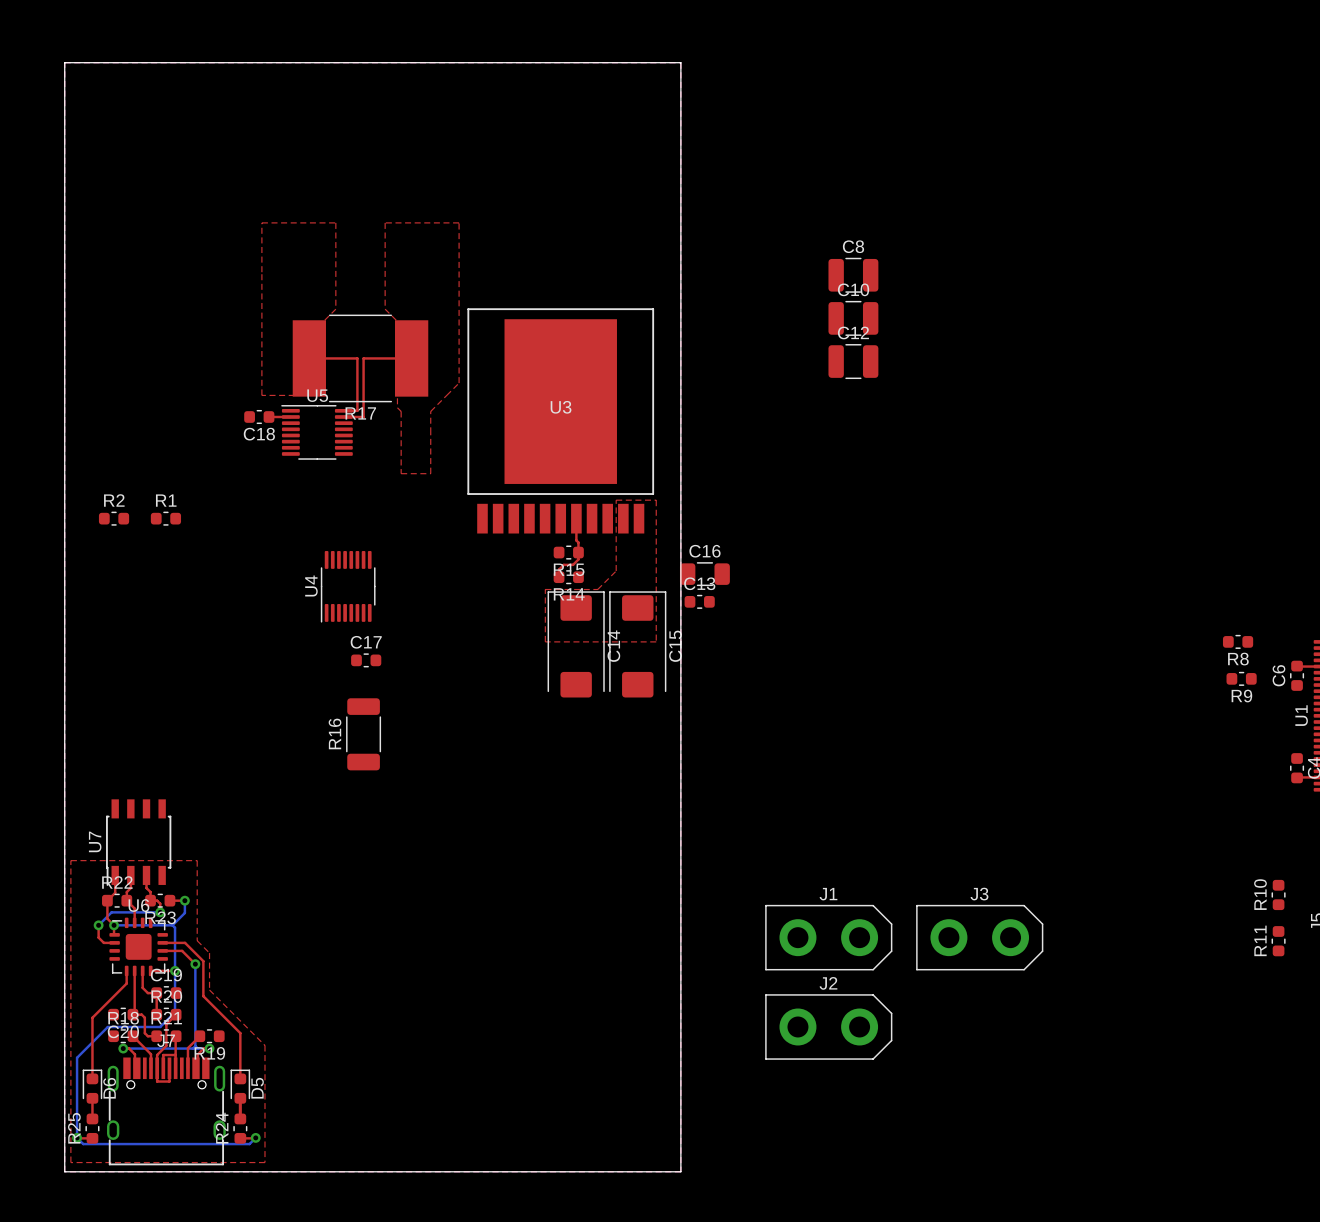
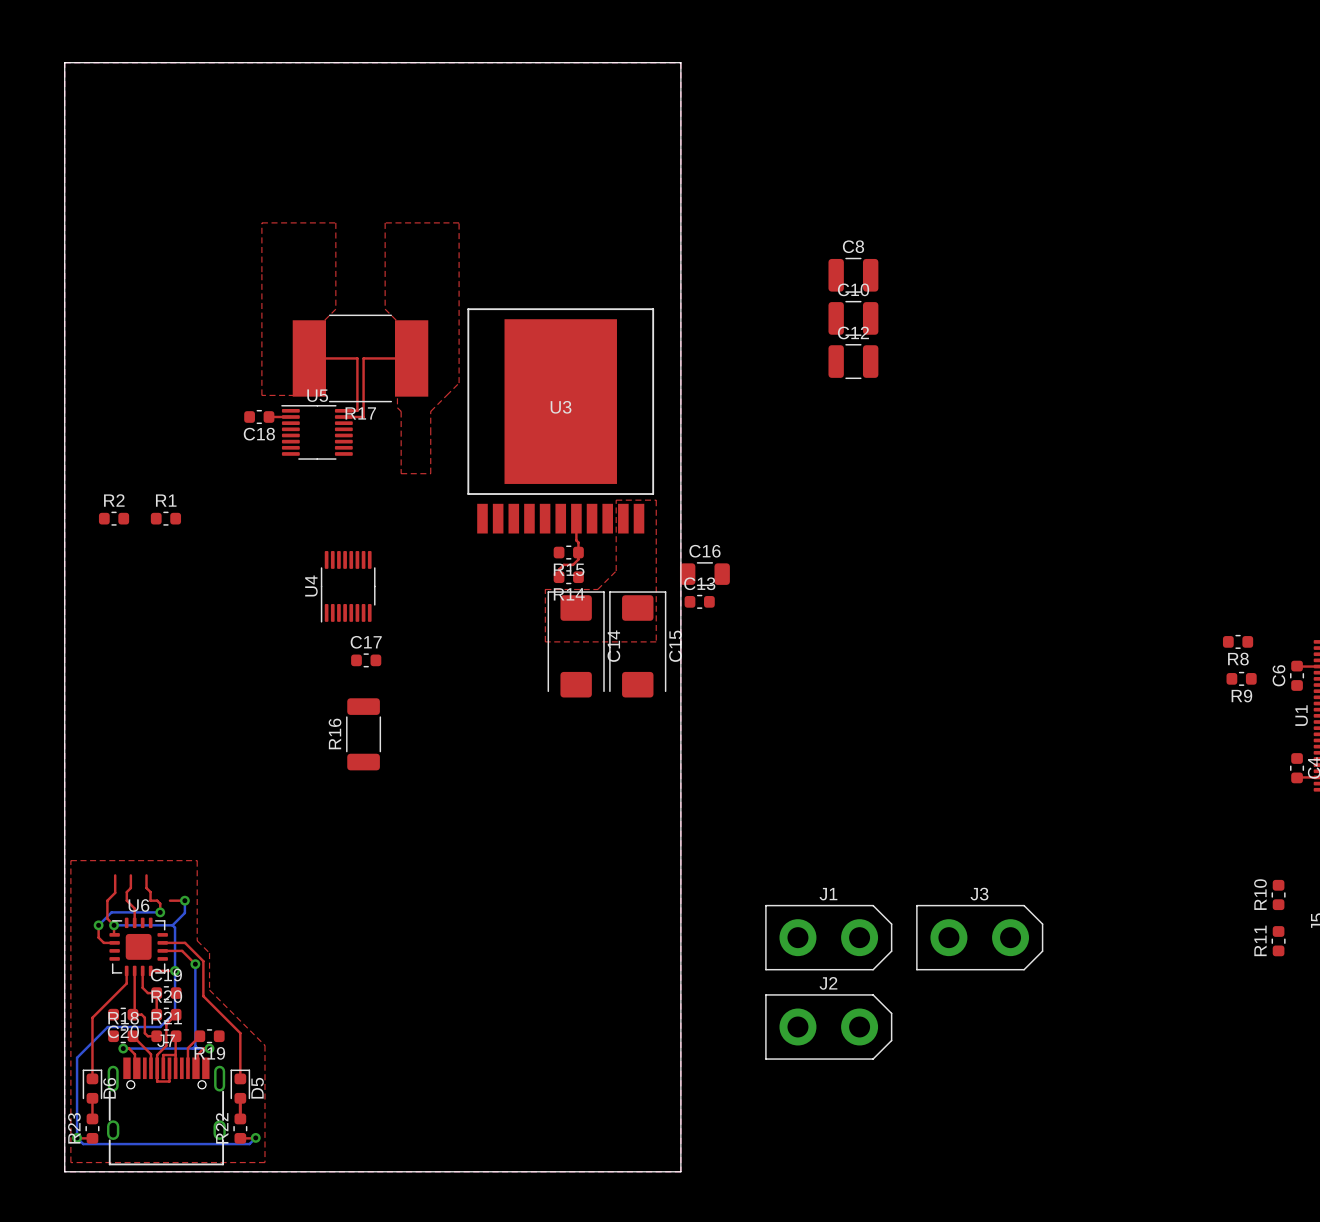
U7: (138, 842) -> none
R22: (117, 900) -> none
R23: (160, 900) -> none
R25 name: R25 (74, 1128) -> R23 (74, 1128)
R24 name: R24 (222, 1128) -> R22 (222, 1128)

